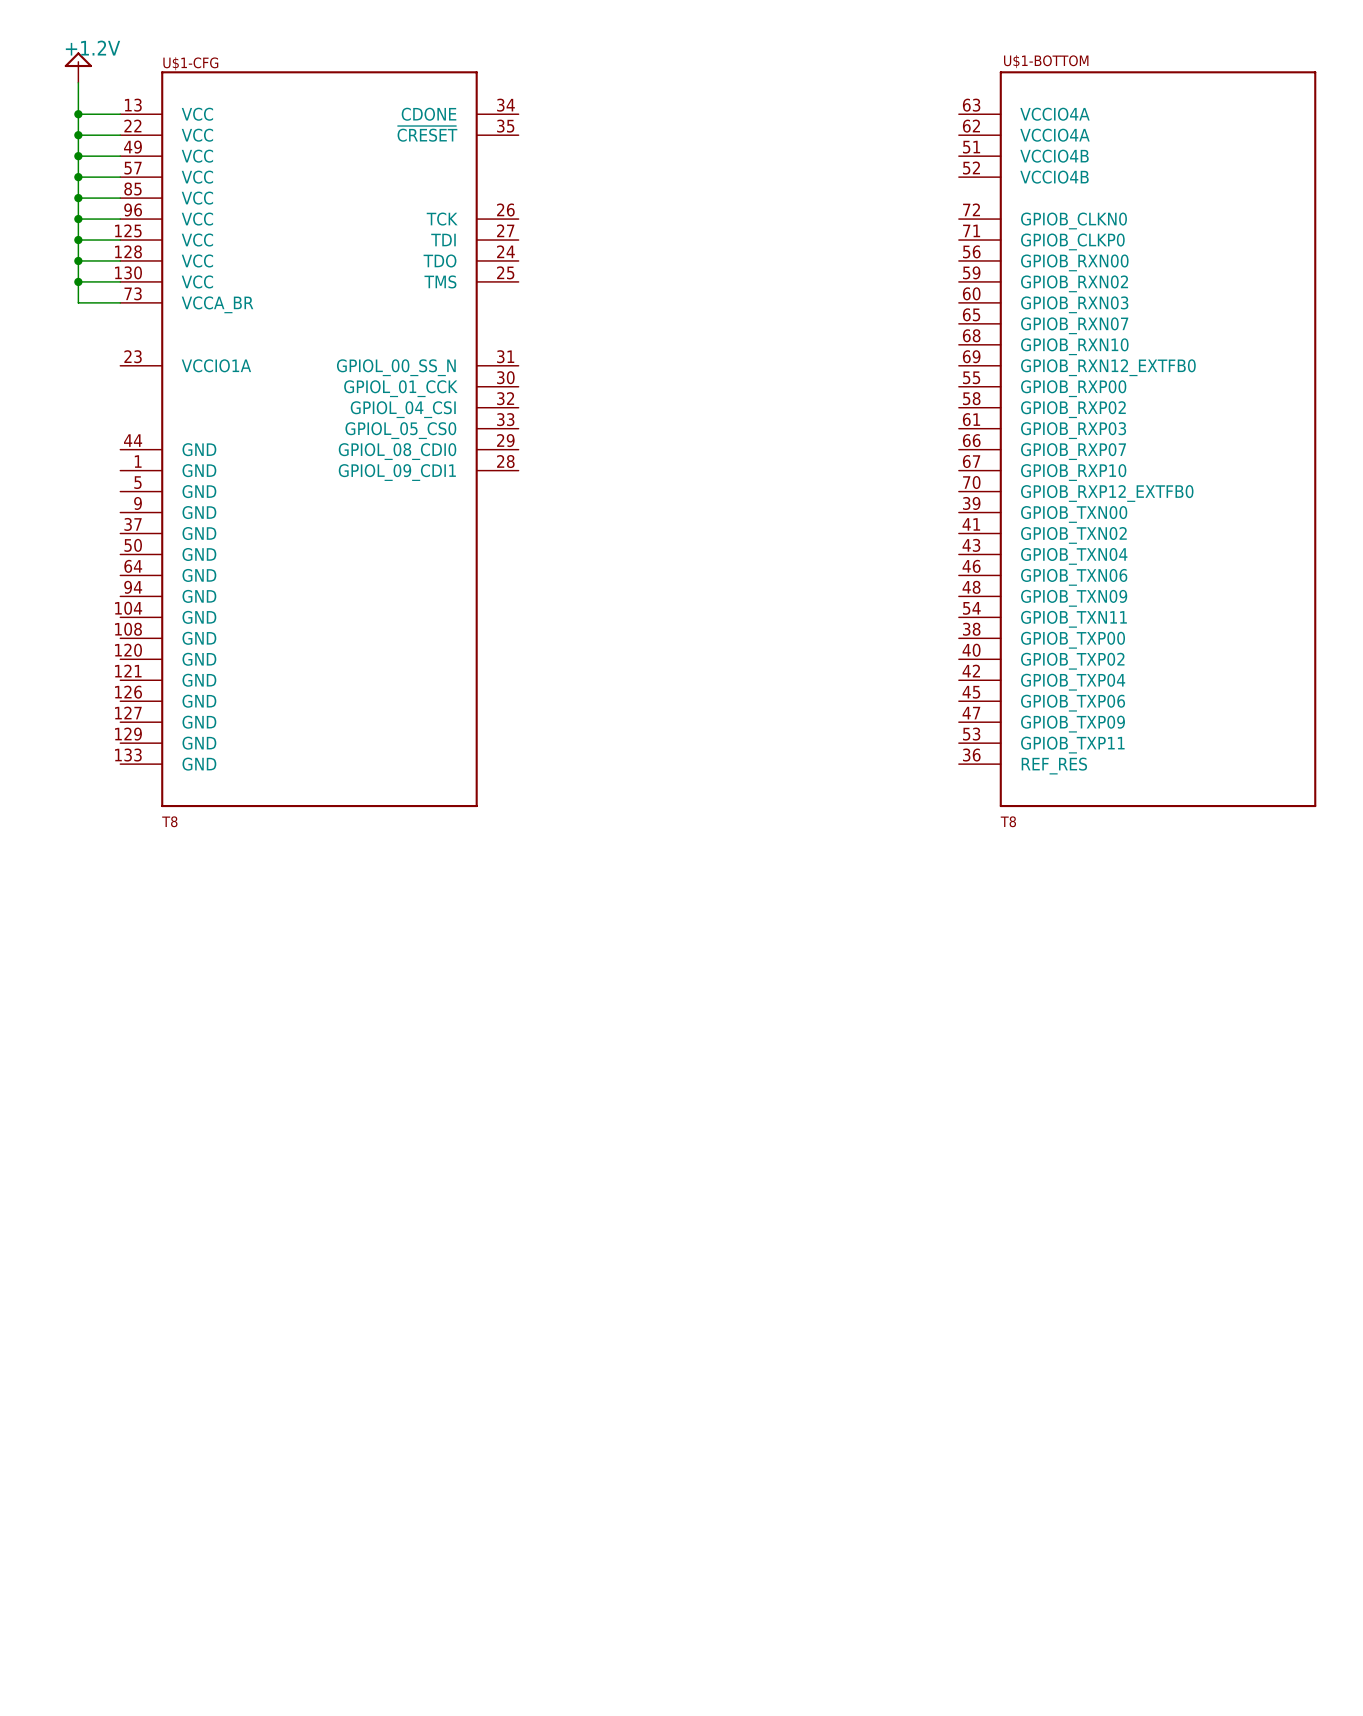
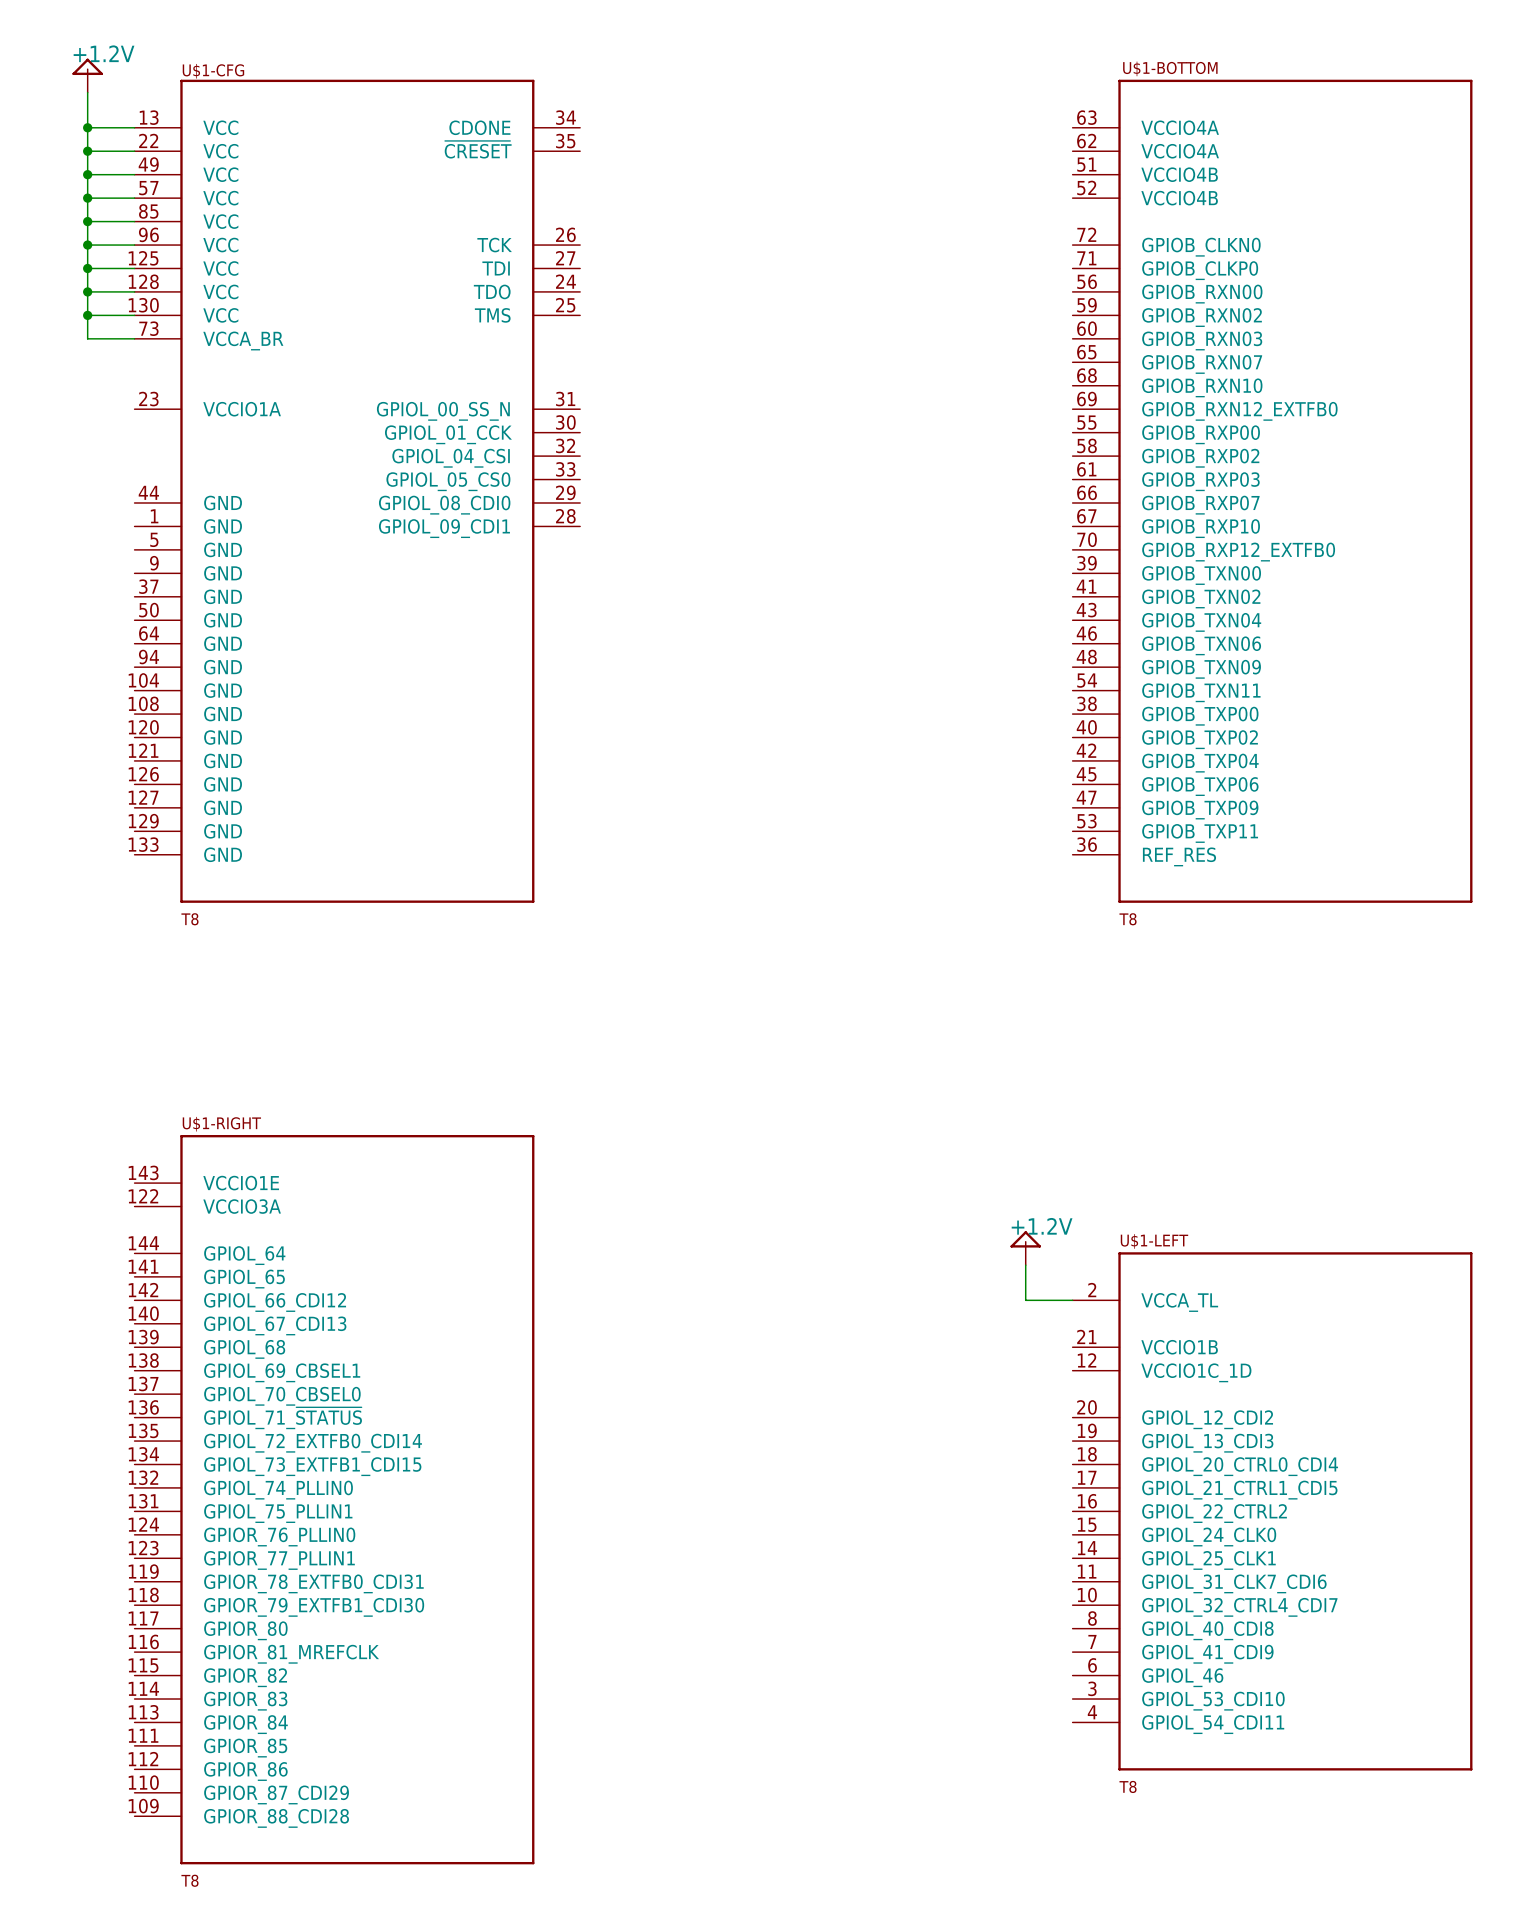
power symbol: none -> +1.2V (1025, 1248)
wire: none -> (1025, 1265) (1025, 1300) (1072, 1300)
U$1-RIGHT: none -> T8 (334, 1499)
U$1-LEFT: none -> T8 (1272, 1511)

